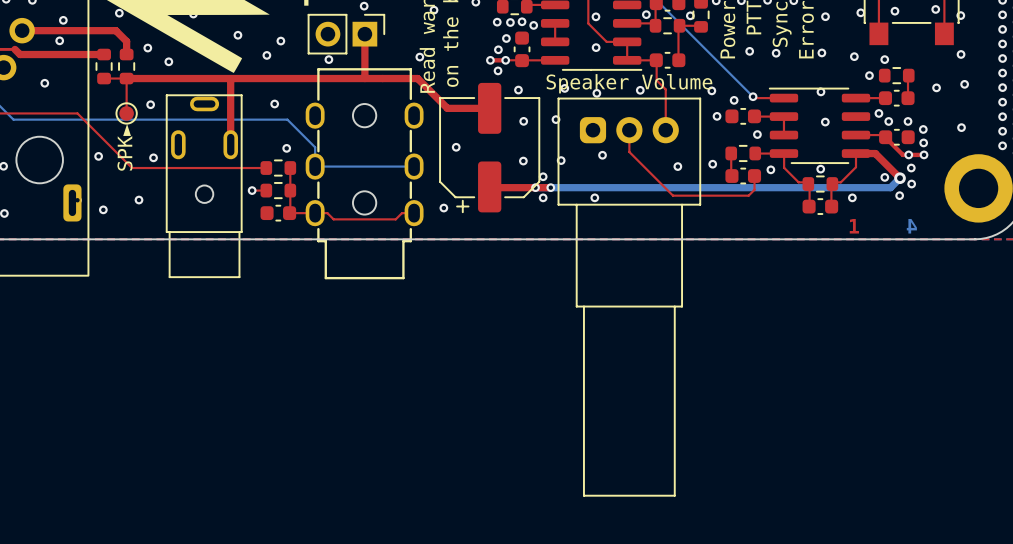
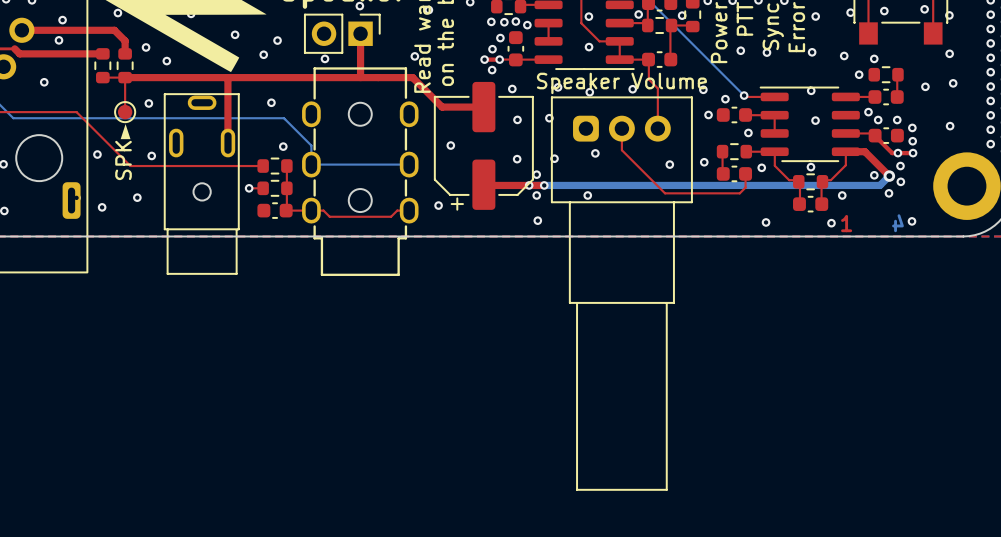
via: none -> (537, 220)
via: none -> (911, 221)
via: none -> (766, 222)
via: none -> (831, 223)

